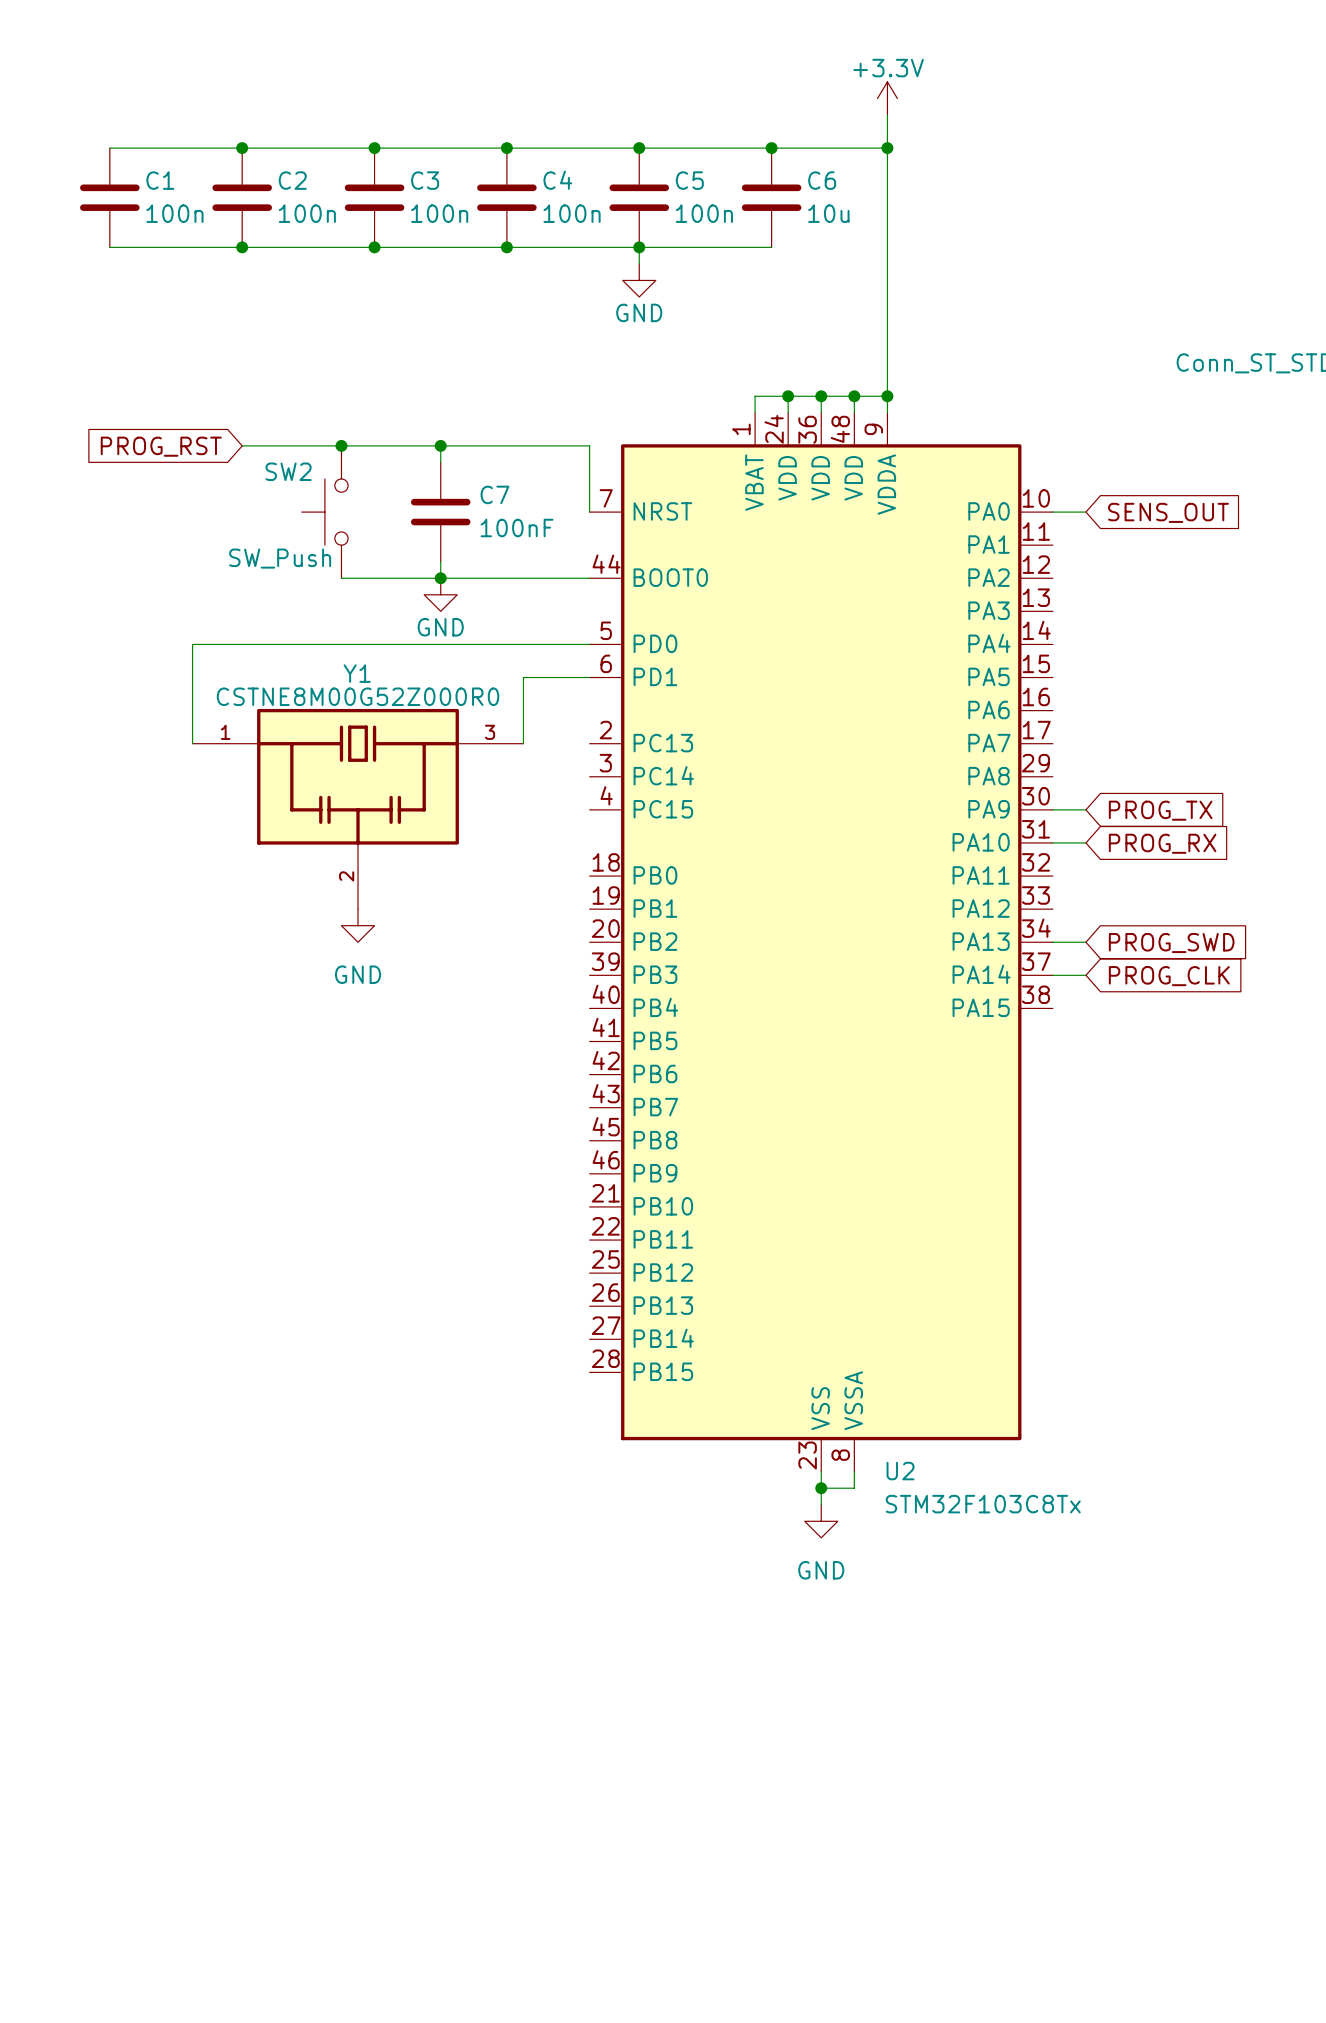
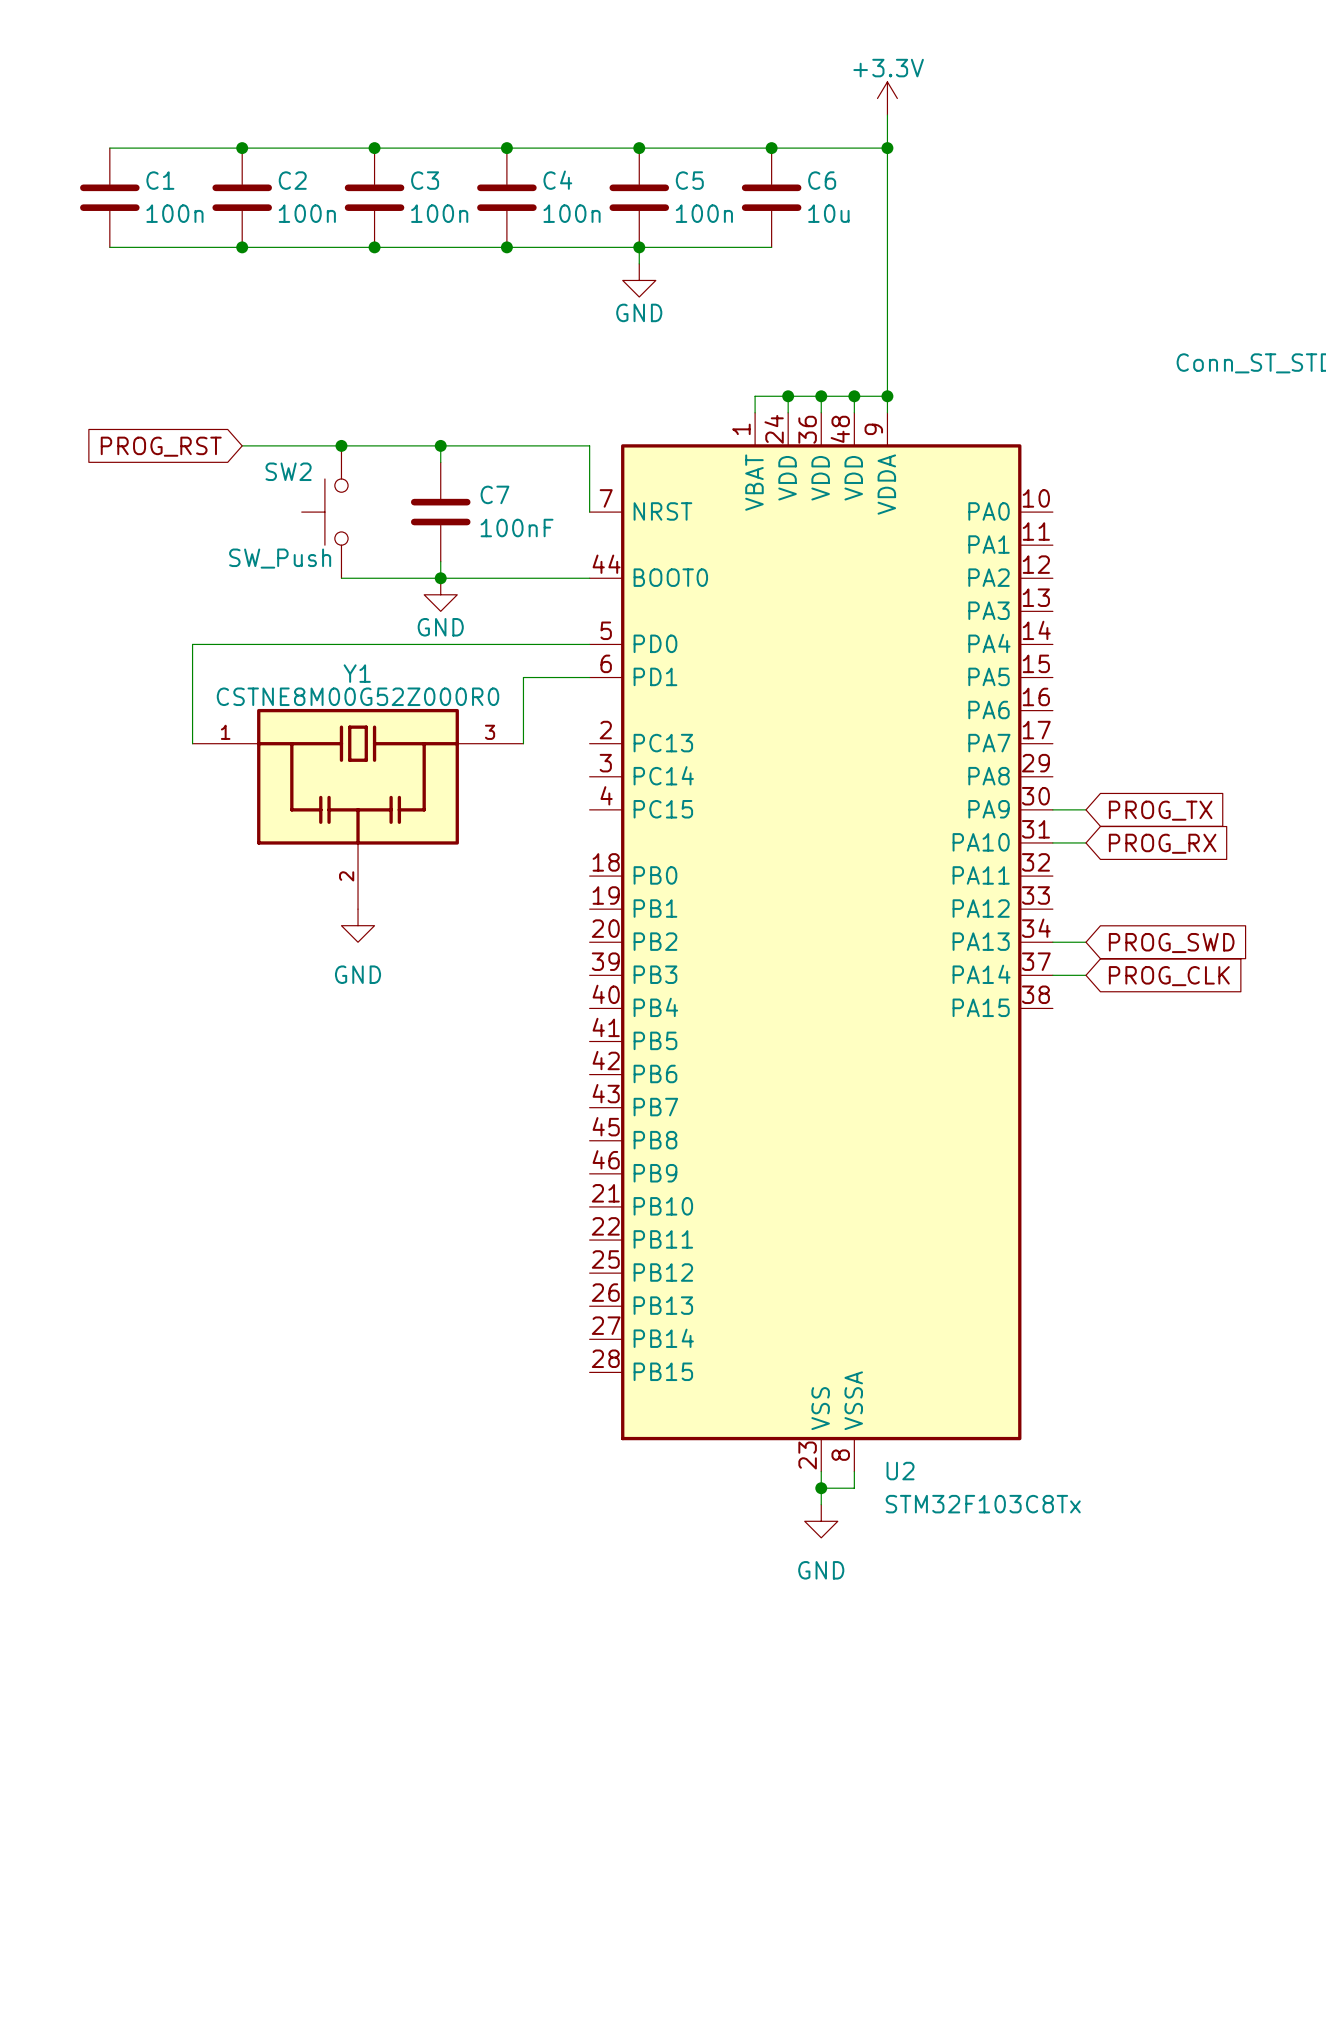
wire: (1052, 512) (1085, 512) -> none
global label: SENS_OUT (1168, 512) -> none

